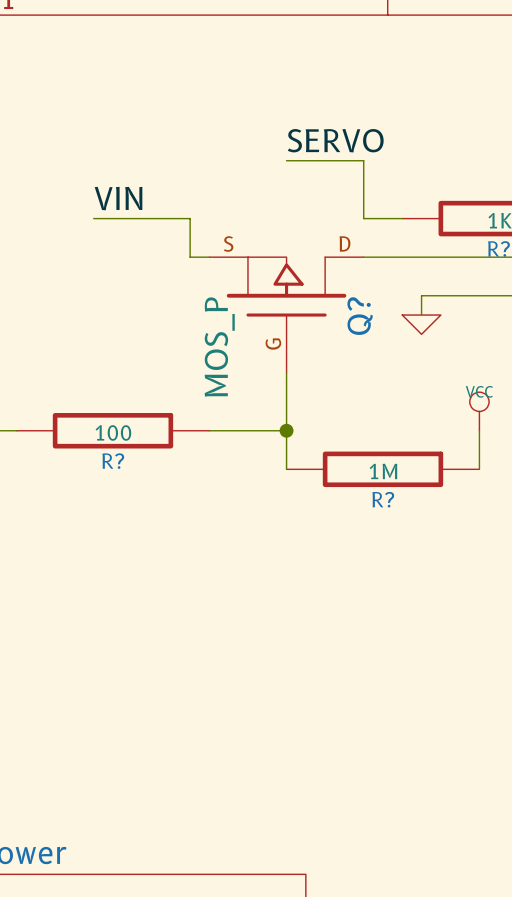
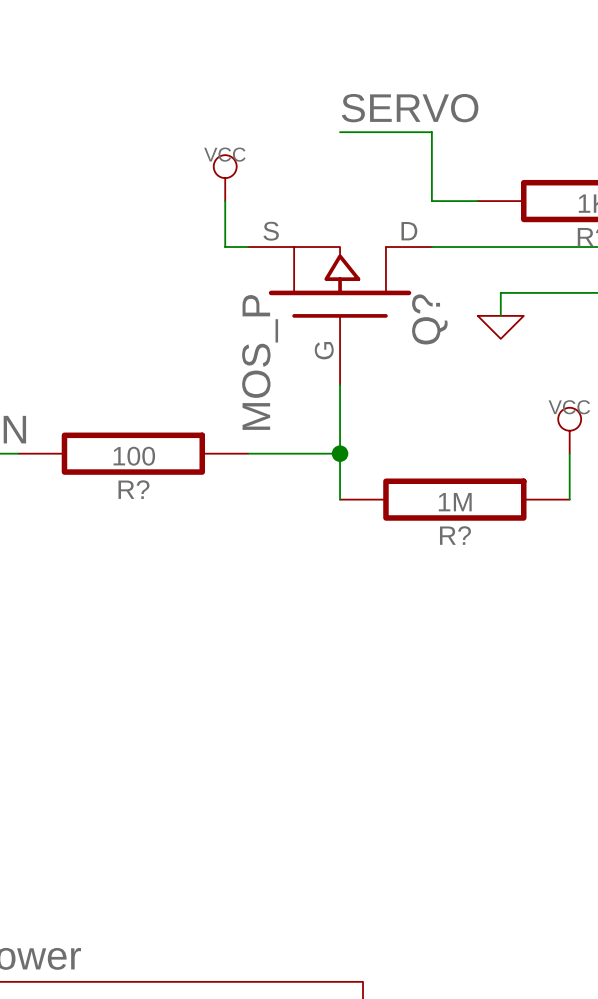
label: VIN (118, 198) -> none
power symbol: none -> VCC (225, 178)
wire: (93, 218) (190, 218) -> none

